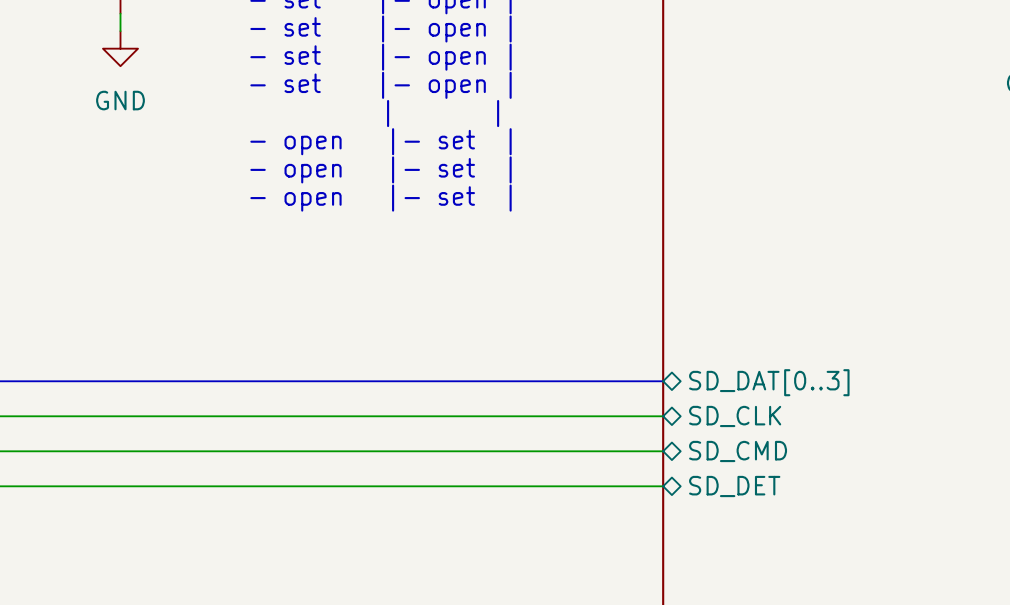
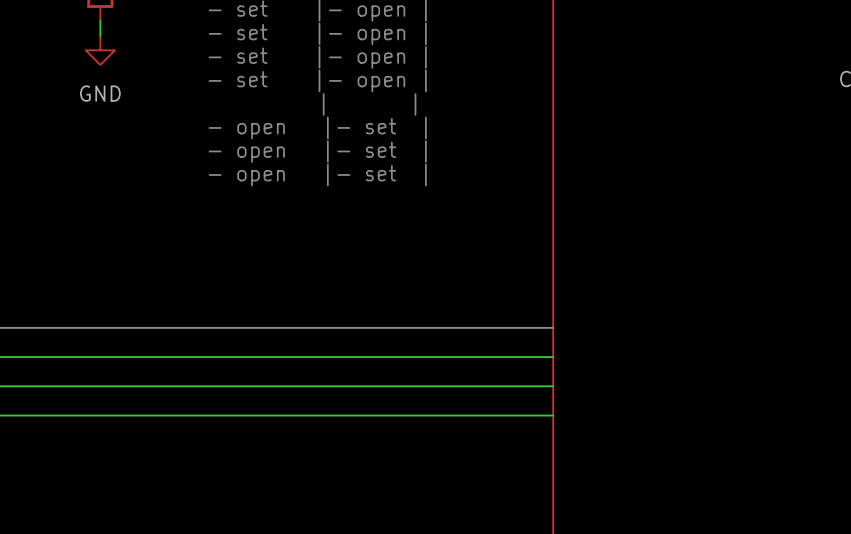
sheet pin: SD_DAT[0..3] (769, 382) -> none
sheet pin: SD_CLK (735, 416) -> none
sheet pin: SD_CMD (738, 451) -> none
sheet pin: SD_DET (734, 486) -> none

